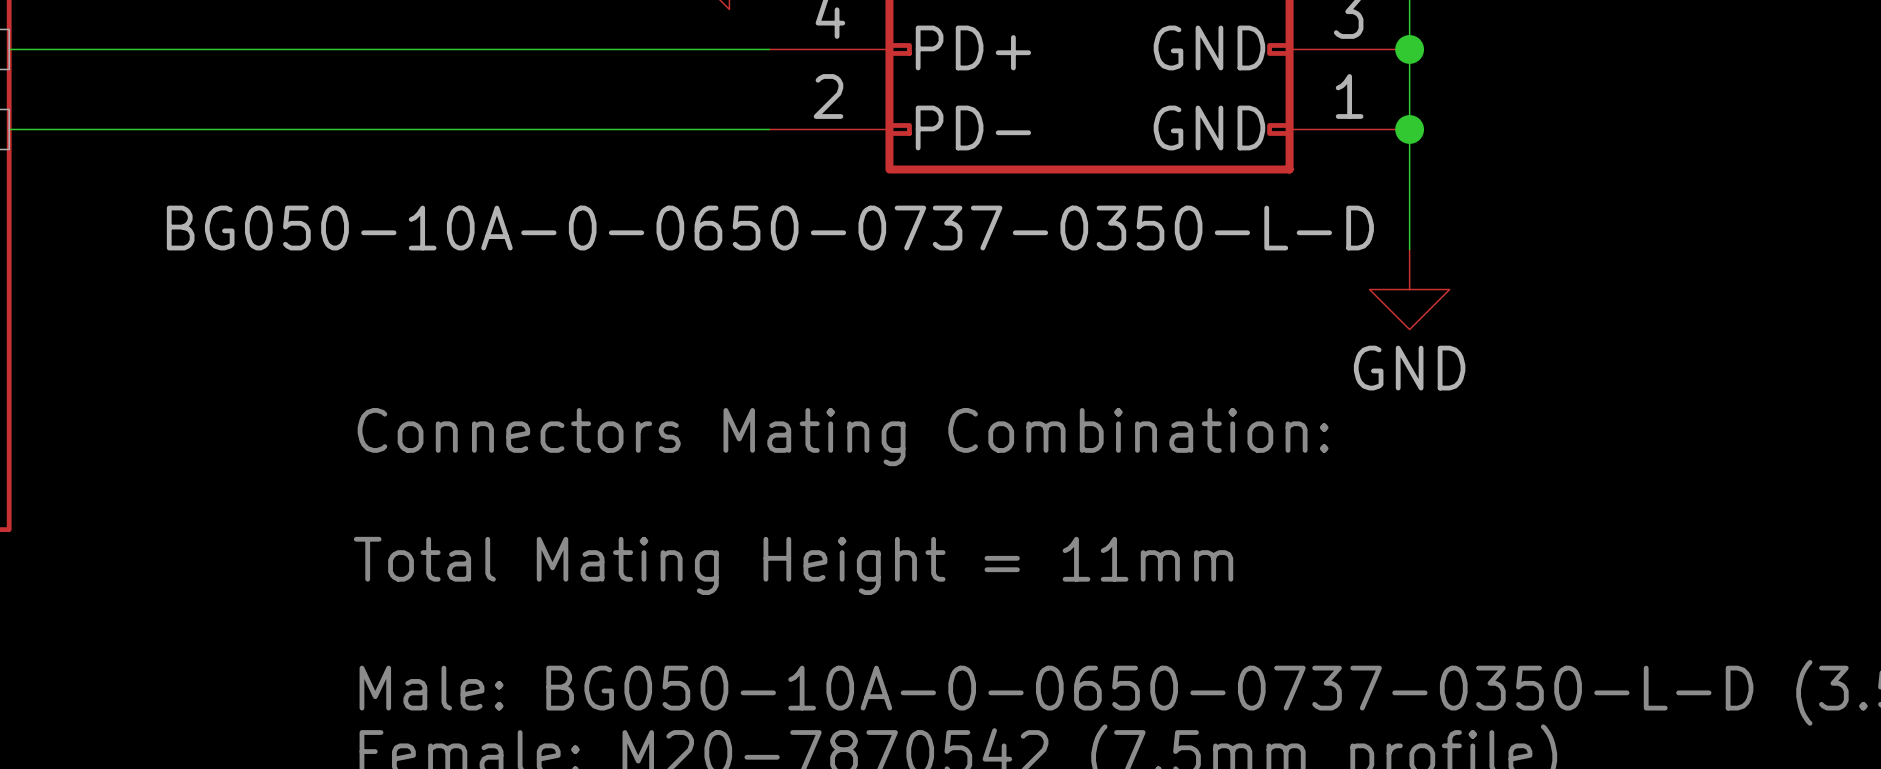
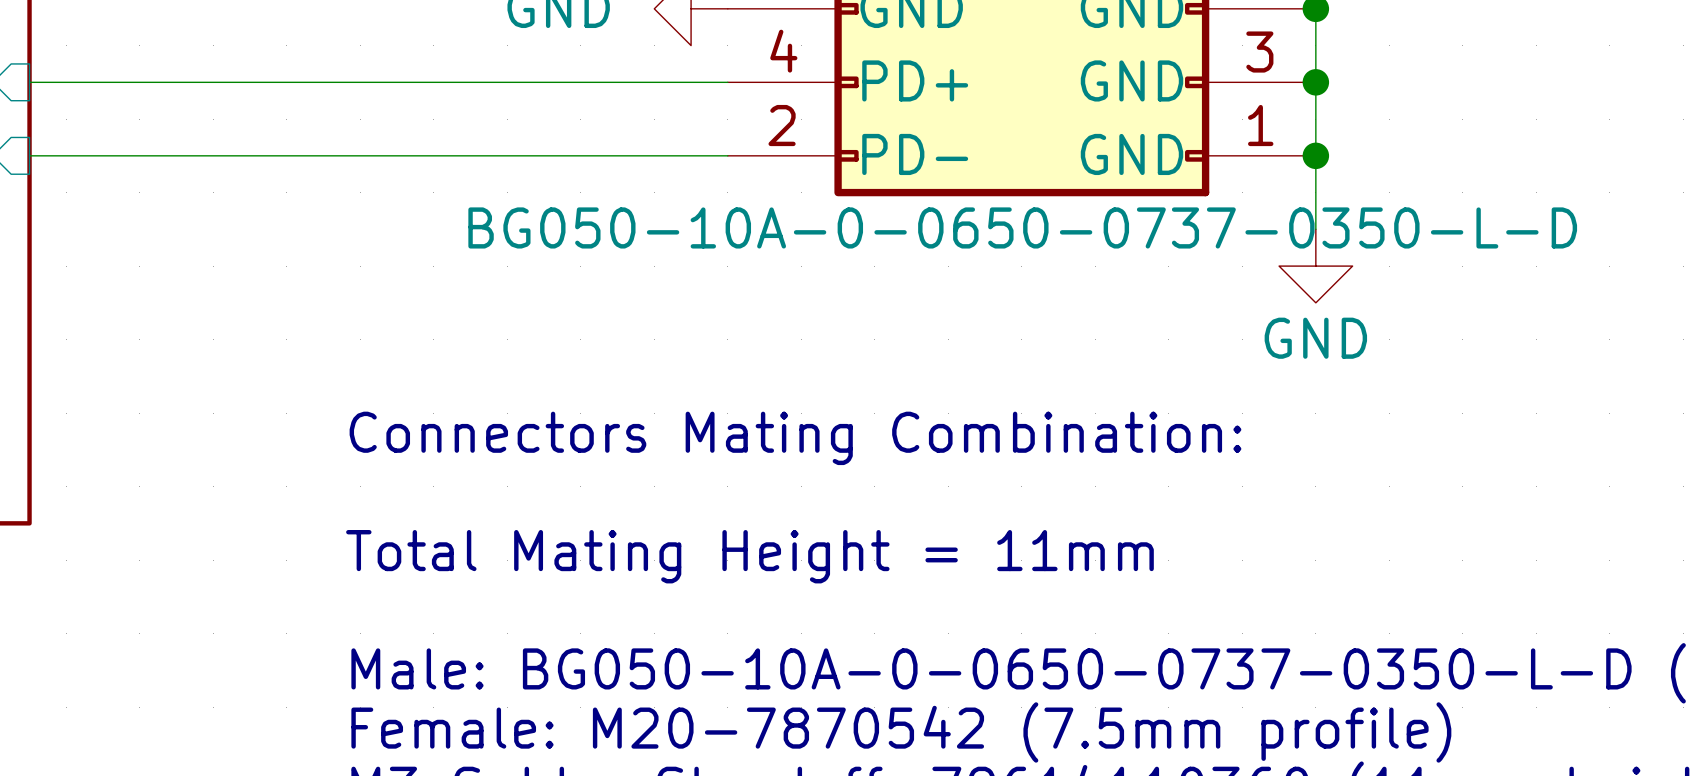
part value position: BG050-10A-0-0650-0737-0350-L-D (770, 228) -> BG050-10A-0-0650-0737-0350-L-D (1022, 227)
power symbol position: GND (1409, 289) -> GND (1315, 266)

